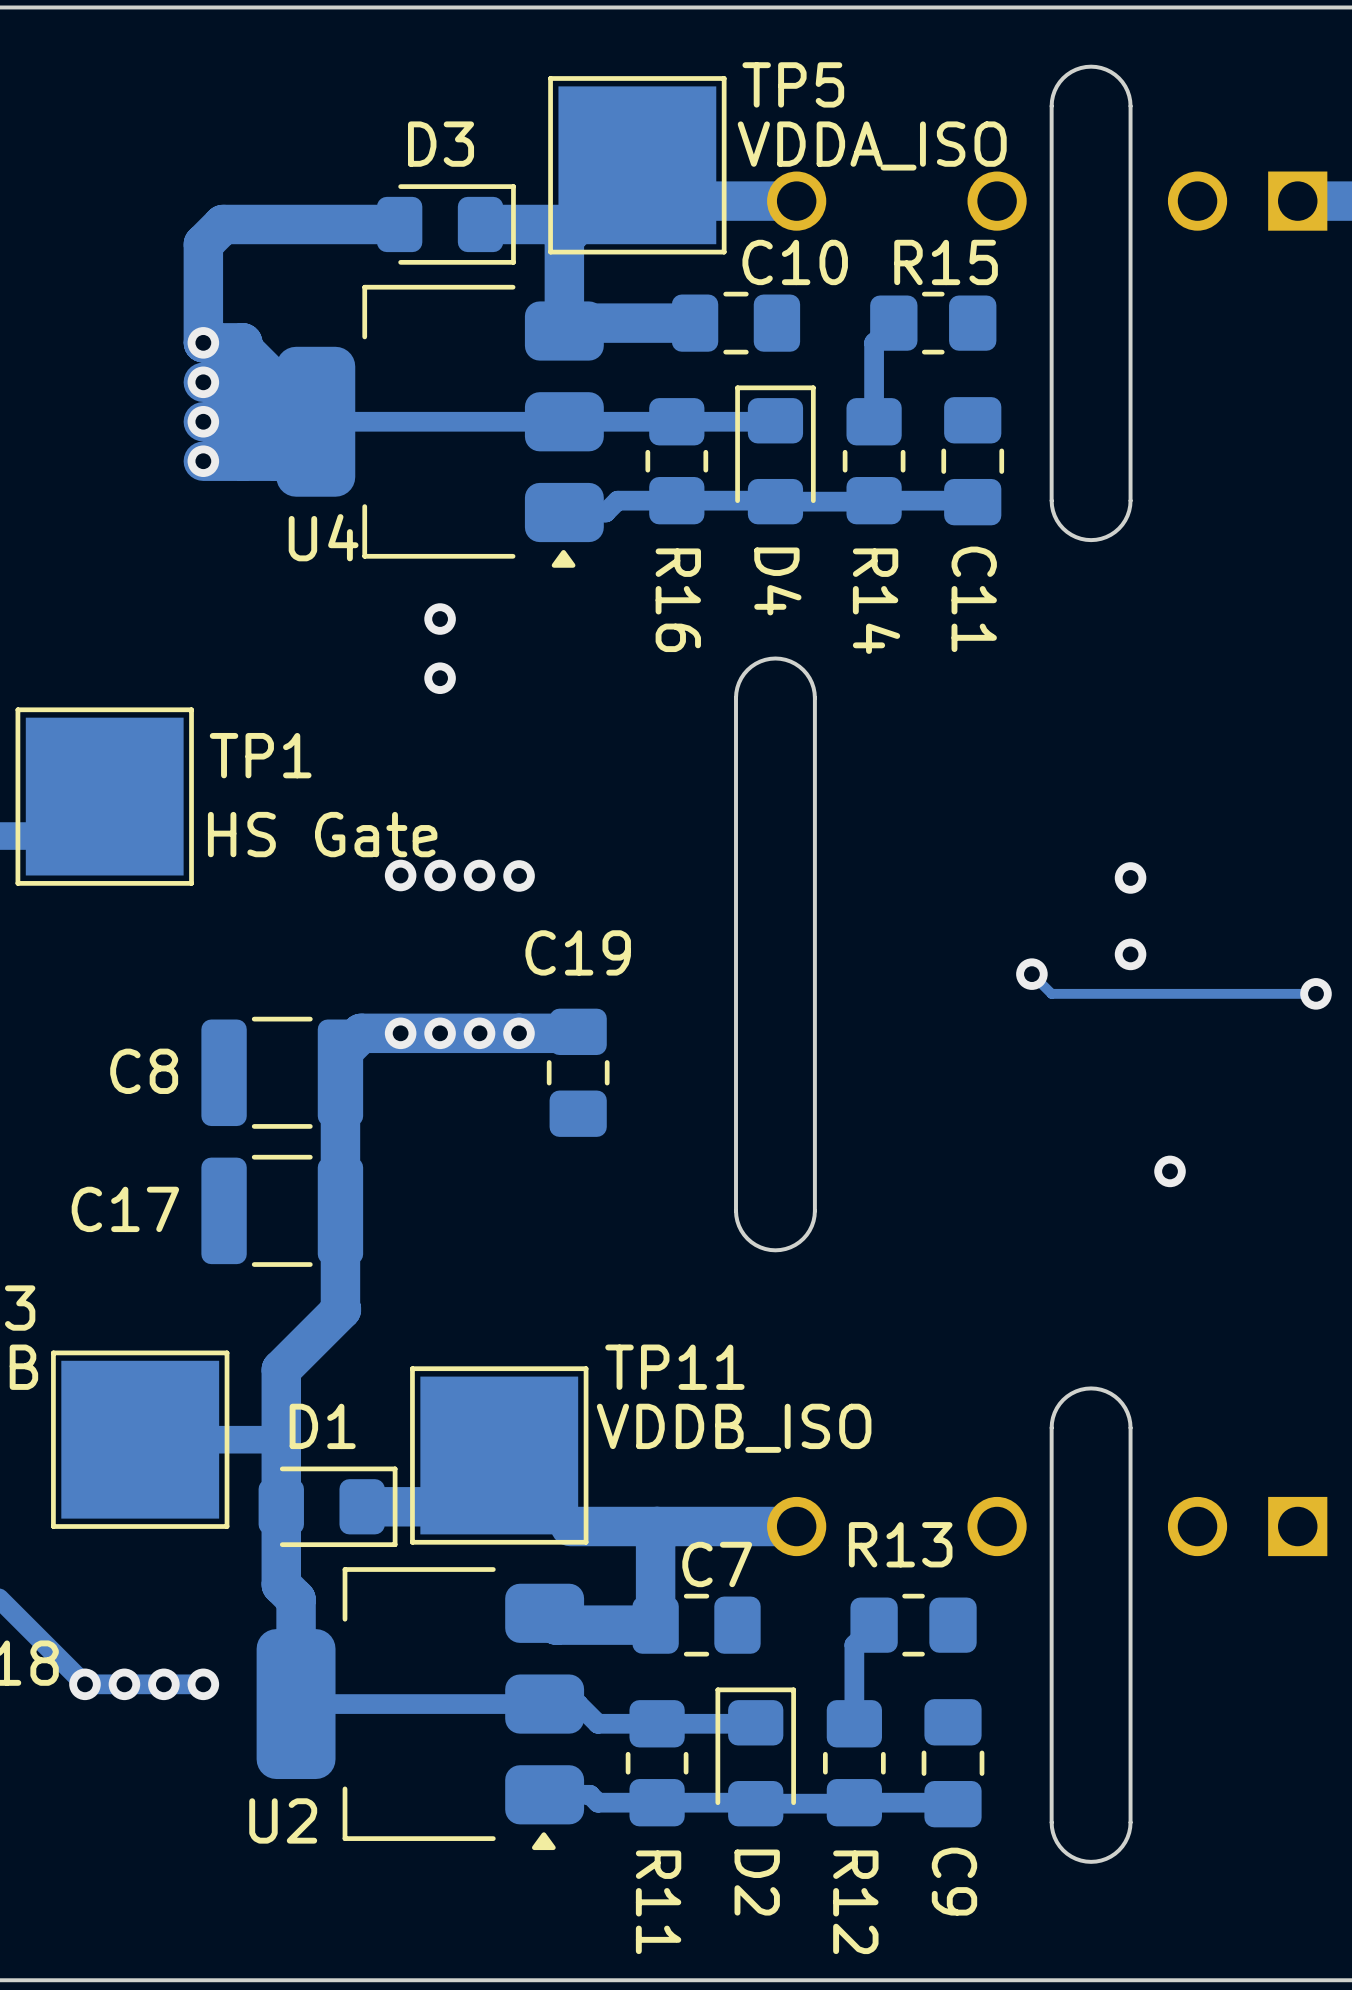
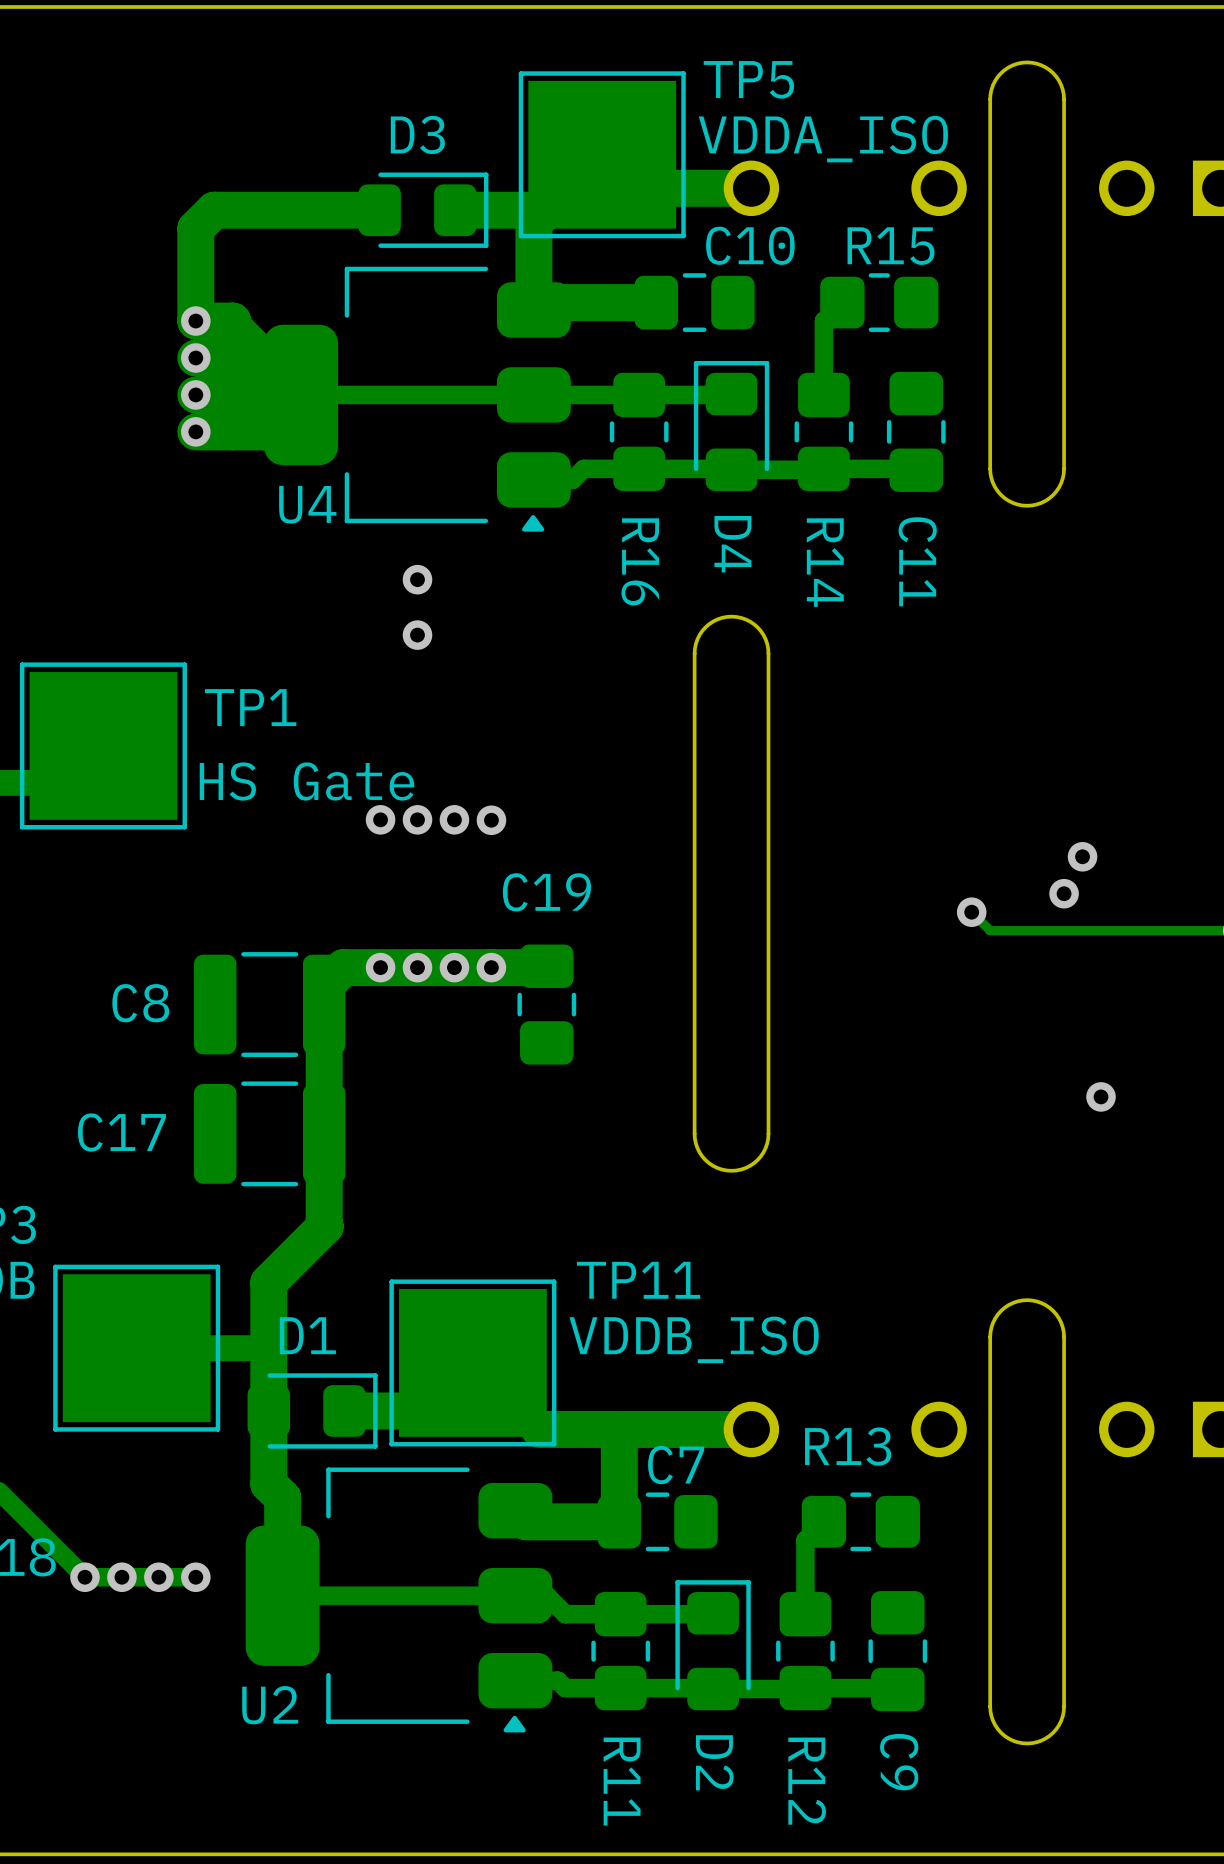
via position: (1130, 877) -> (1082, 856)

